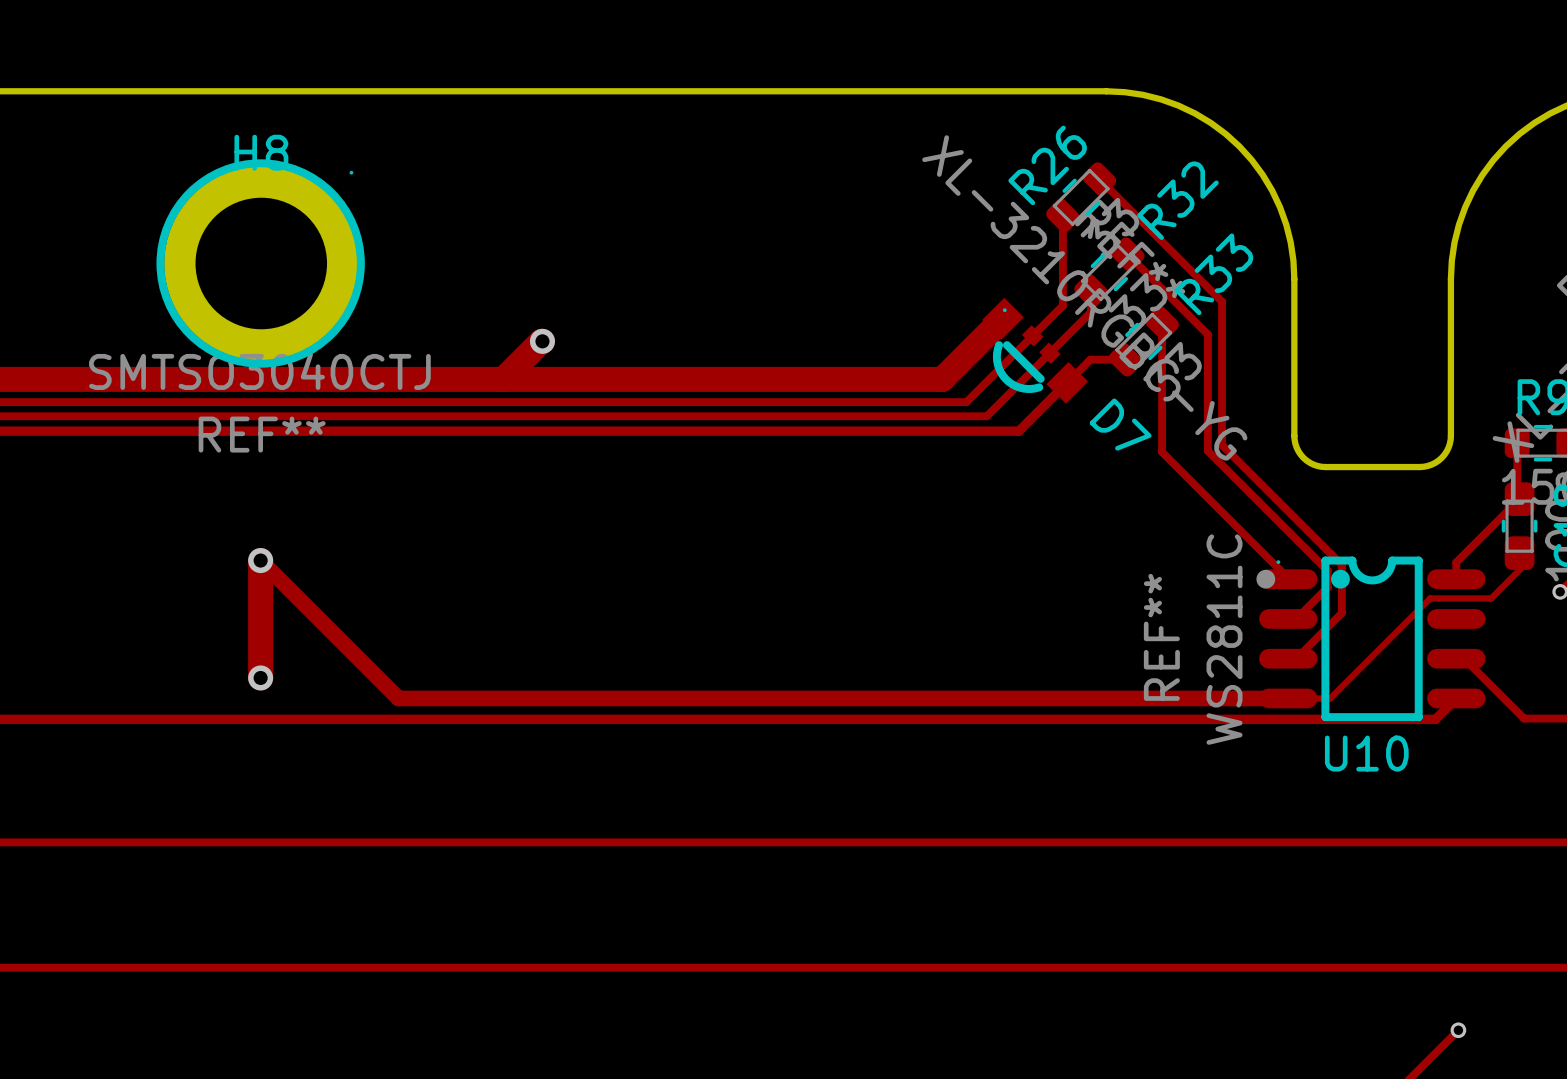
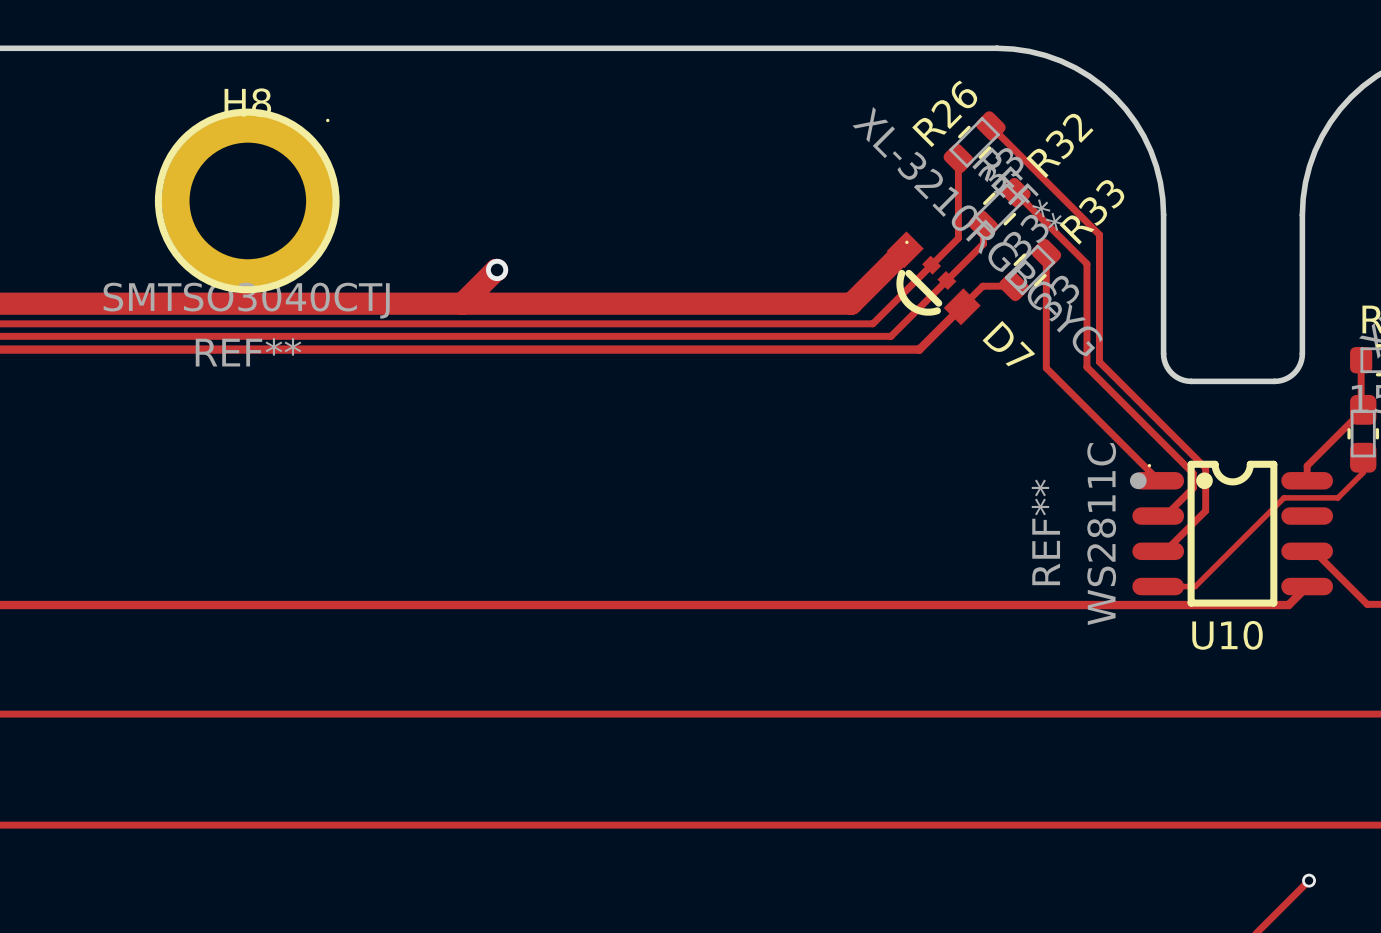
via: (260, 560) -> none
track: (260, 677) (260, 560) (398, 698) (1288, 698) -> none
via: (260, 677) -> none

